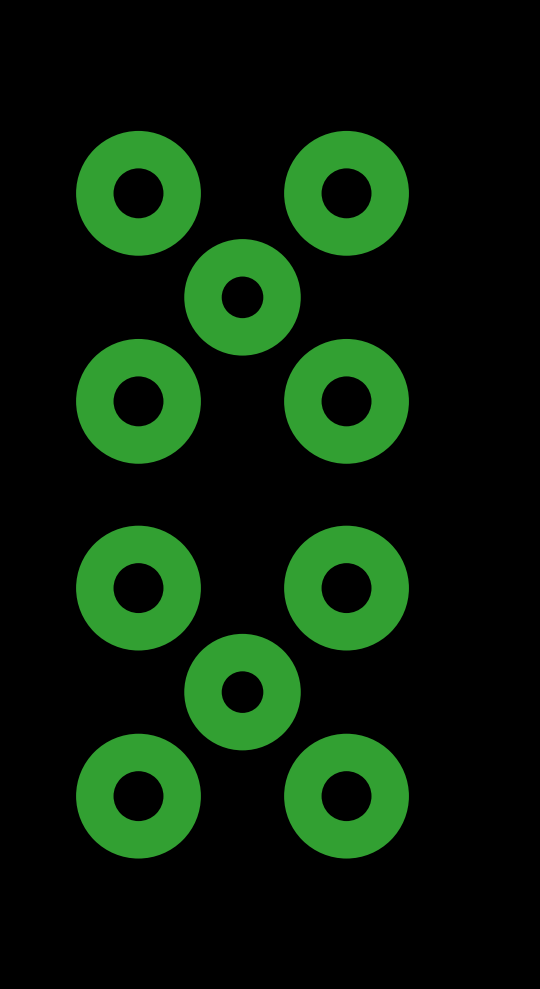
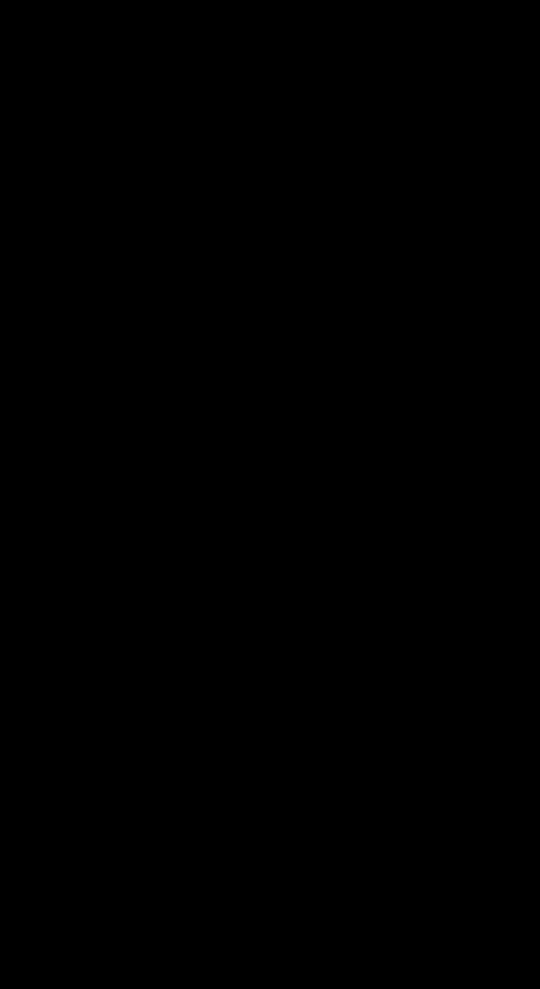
part: (242, 297) -> none
part: (242, 692) -> none

